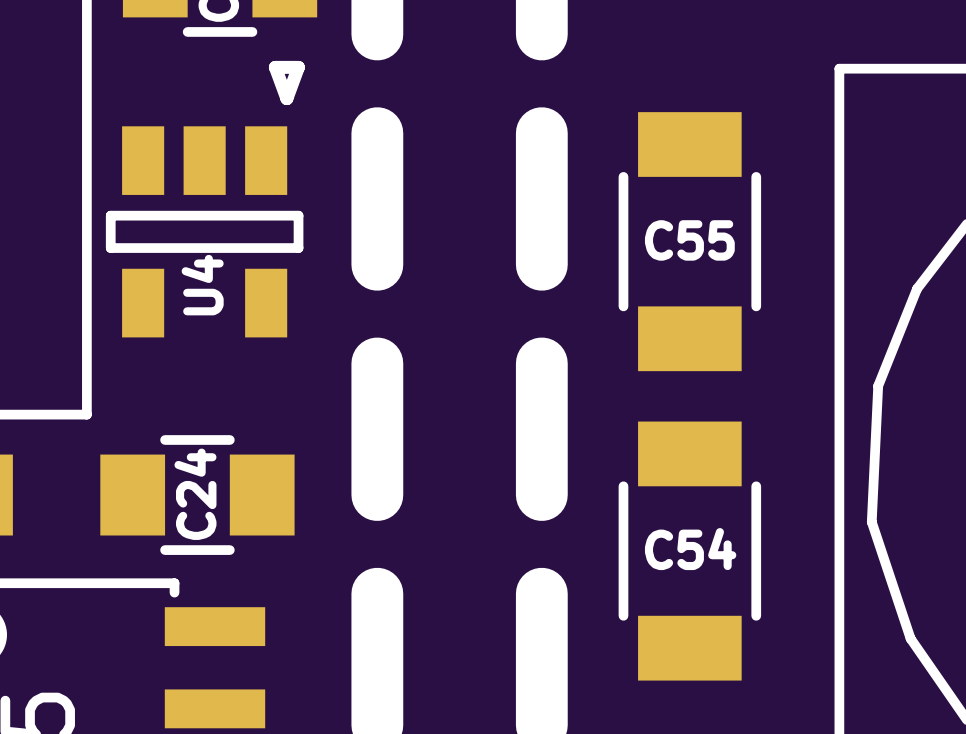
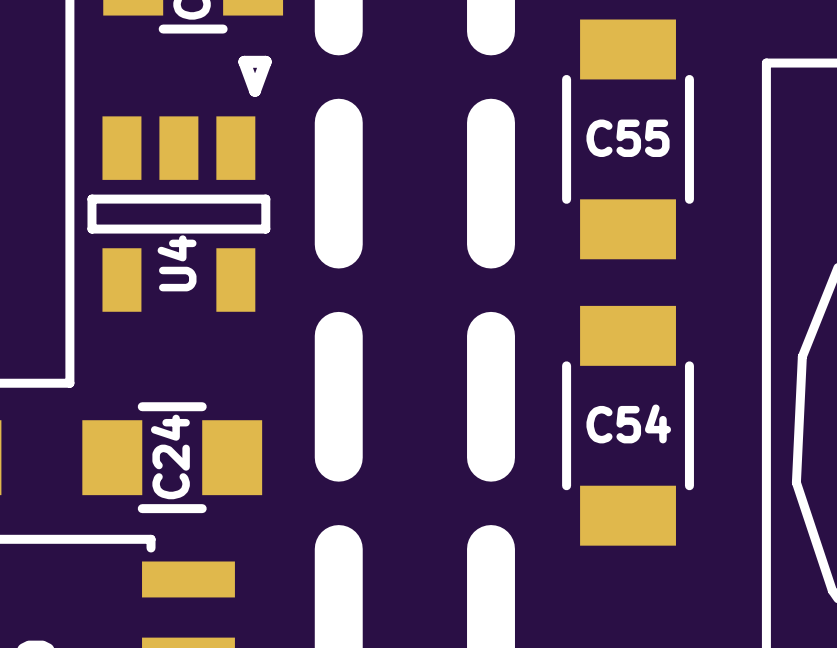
C55 position: (689, 241) -> (628, 139)
C54 position: (689, 551) -> (628, 425)

